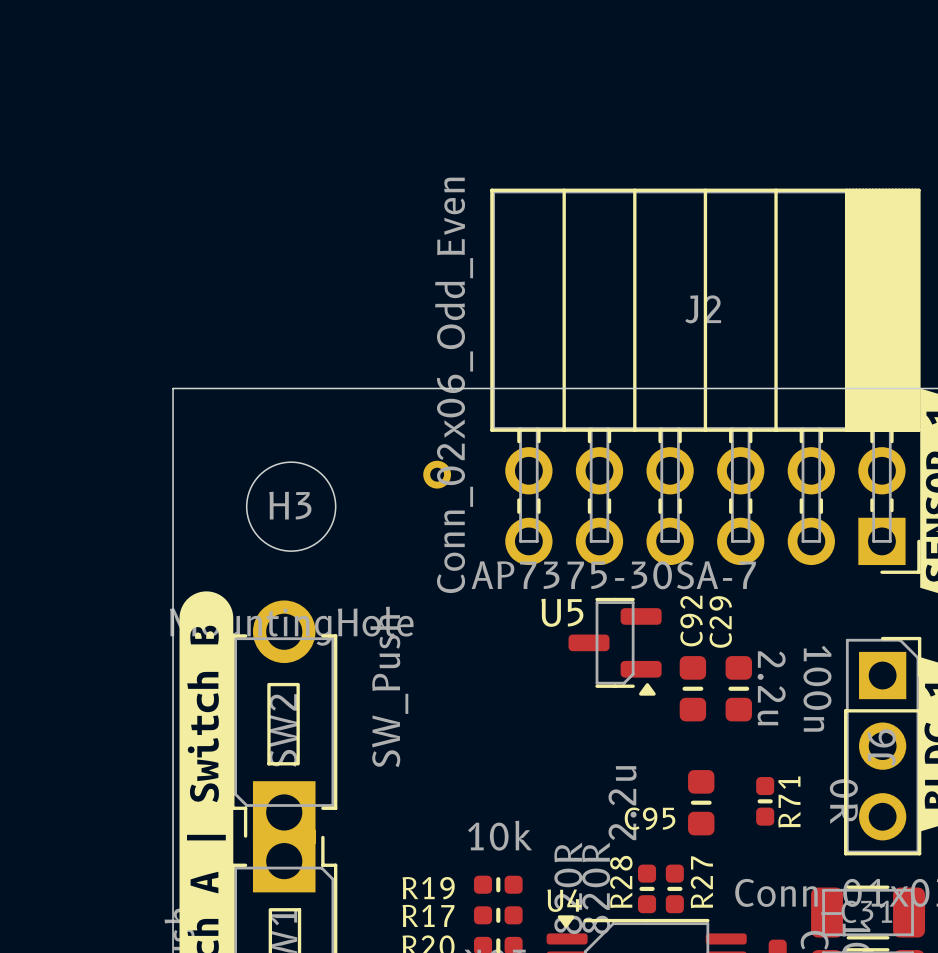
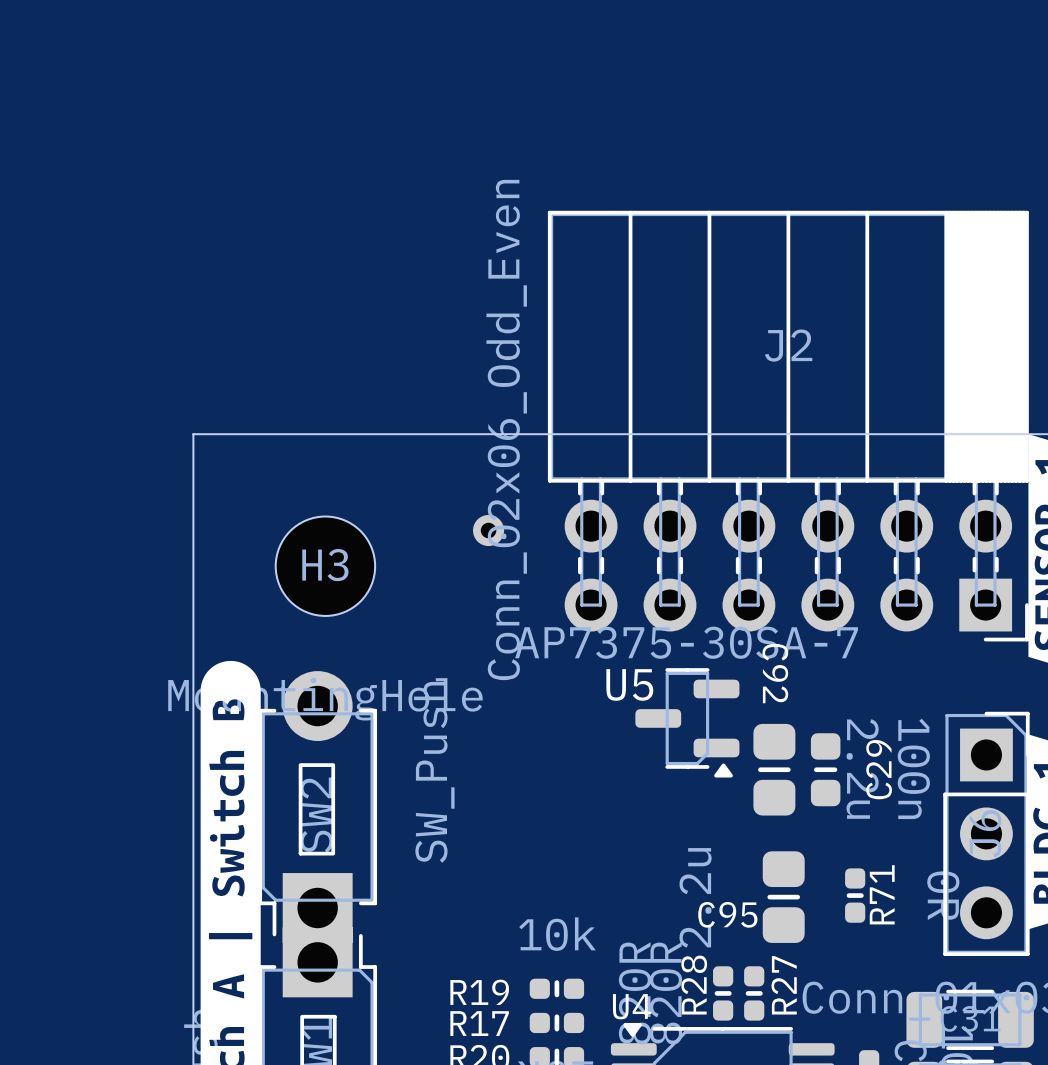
C92 name rotation: 0° (691, 621) -> 180° (775, 673)
C29 name position: C29 (720, 621) -> C29 (879, 769)
C92 footprint: [679, 656, 707, 722] -> [753, 723, 796, 816]
C95 footprint: [688, 770, 715, 836] -> [762, 851, 805, 943]

